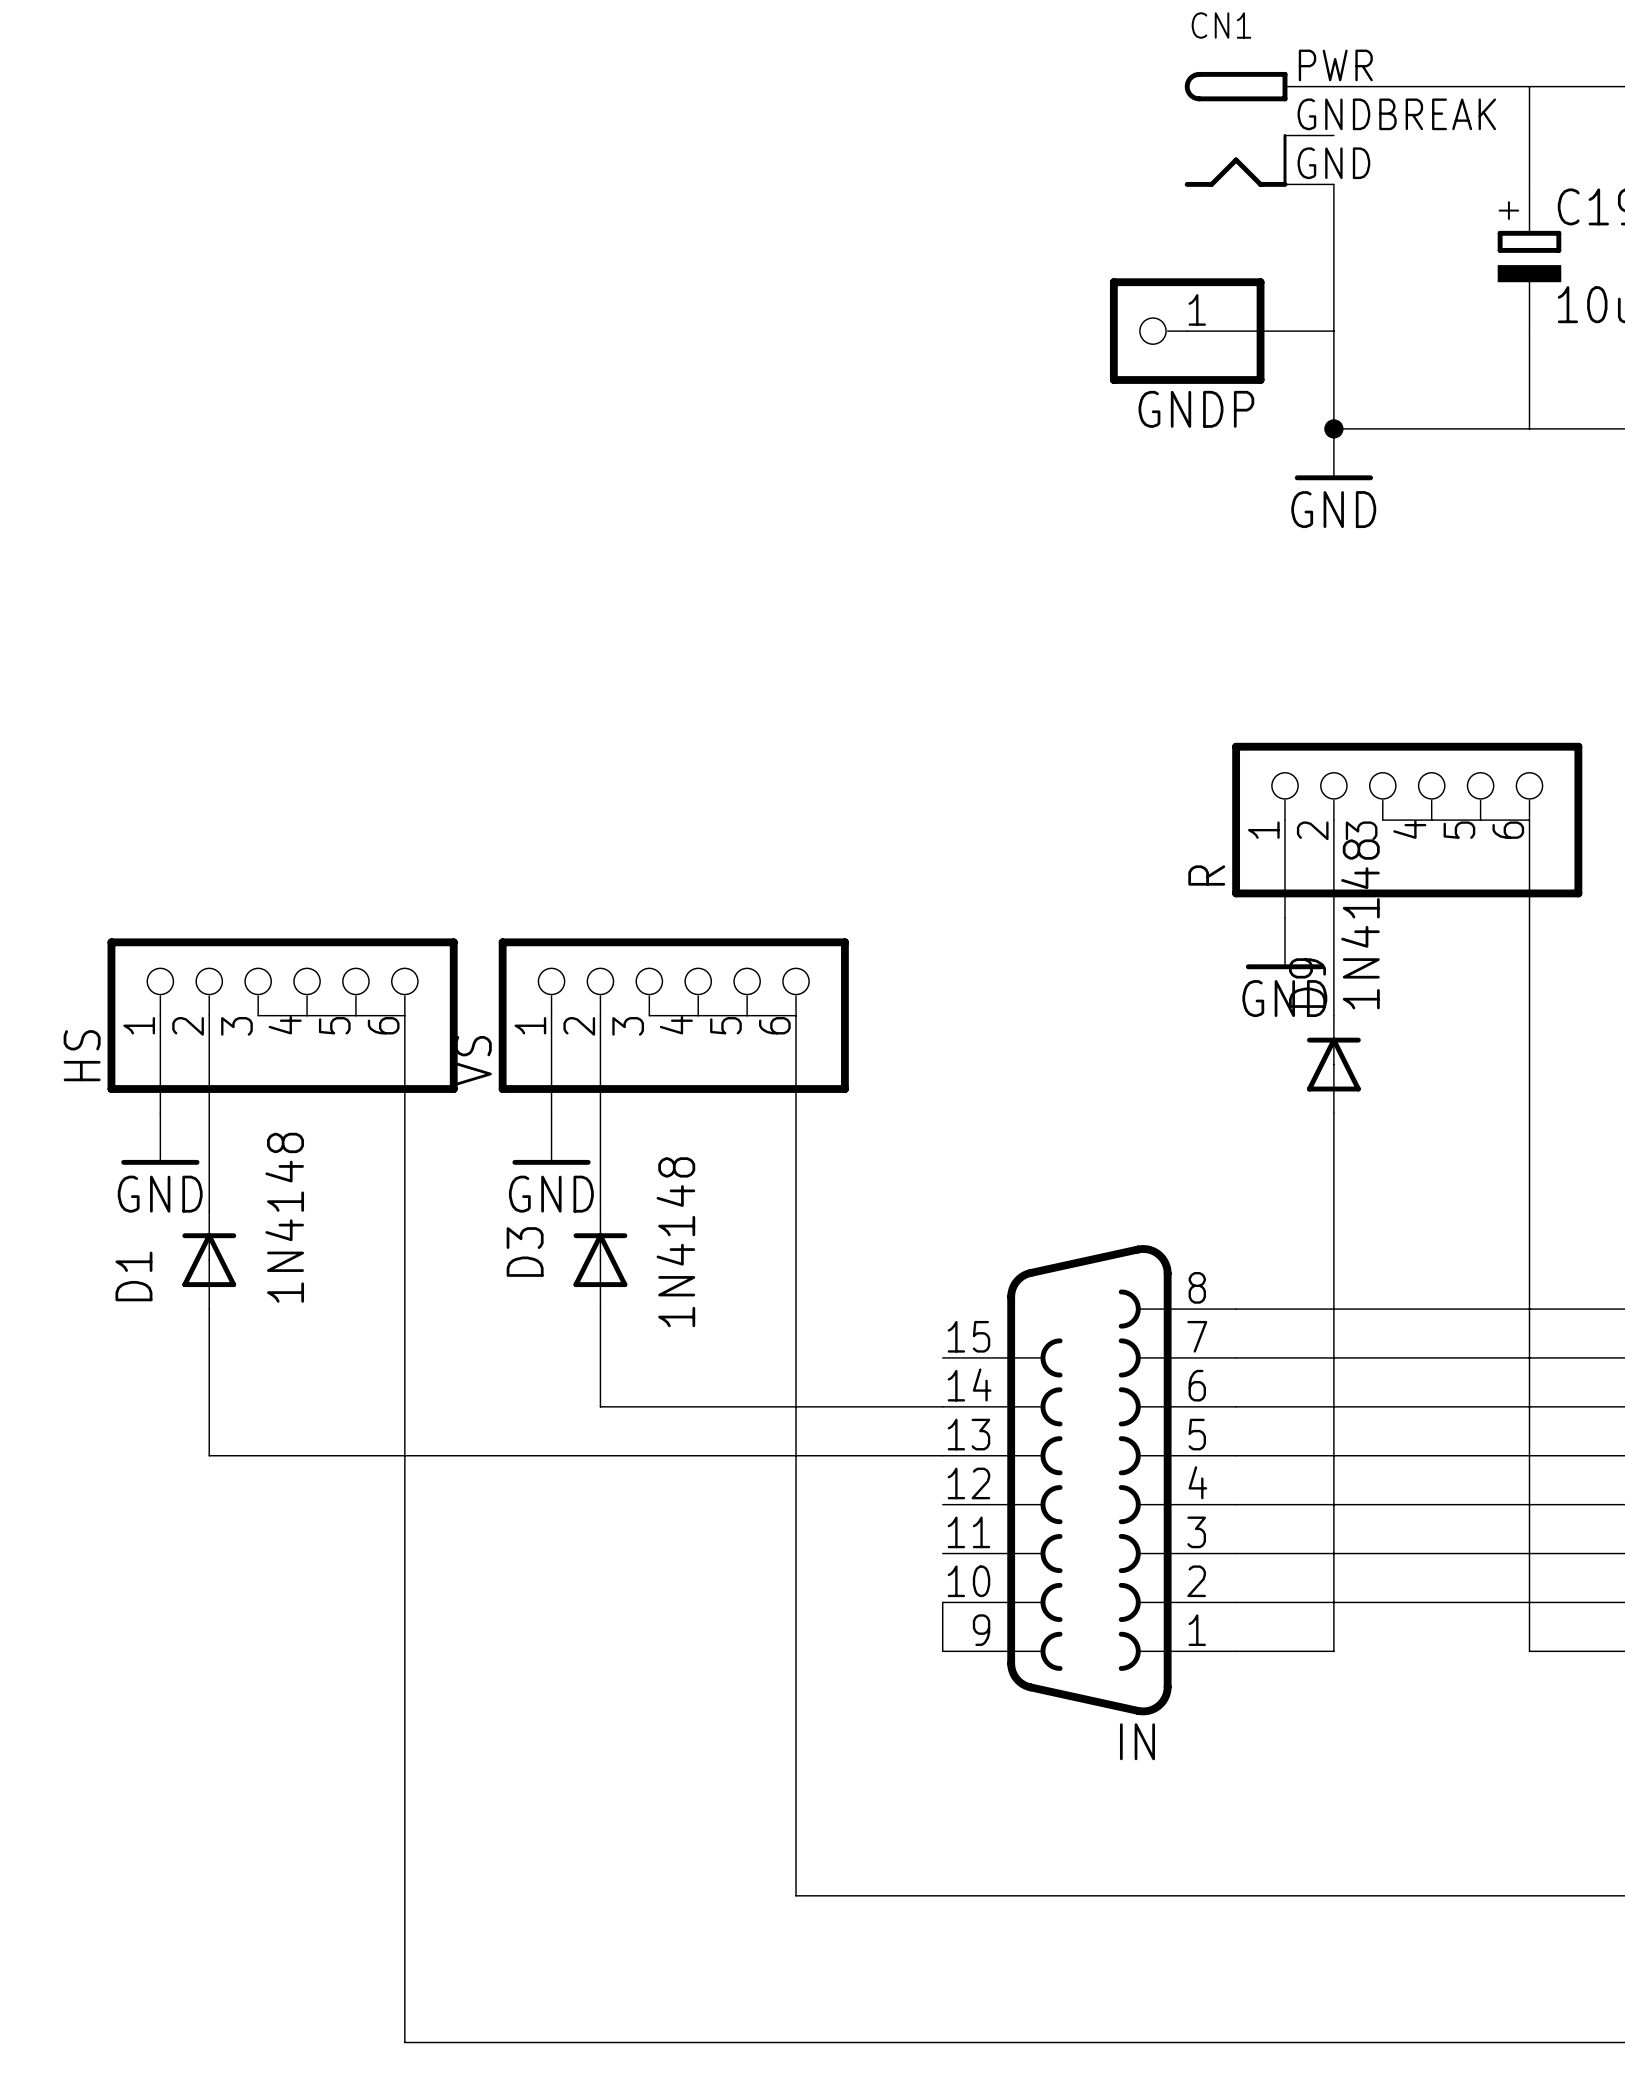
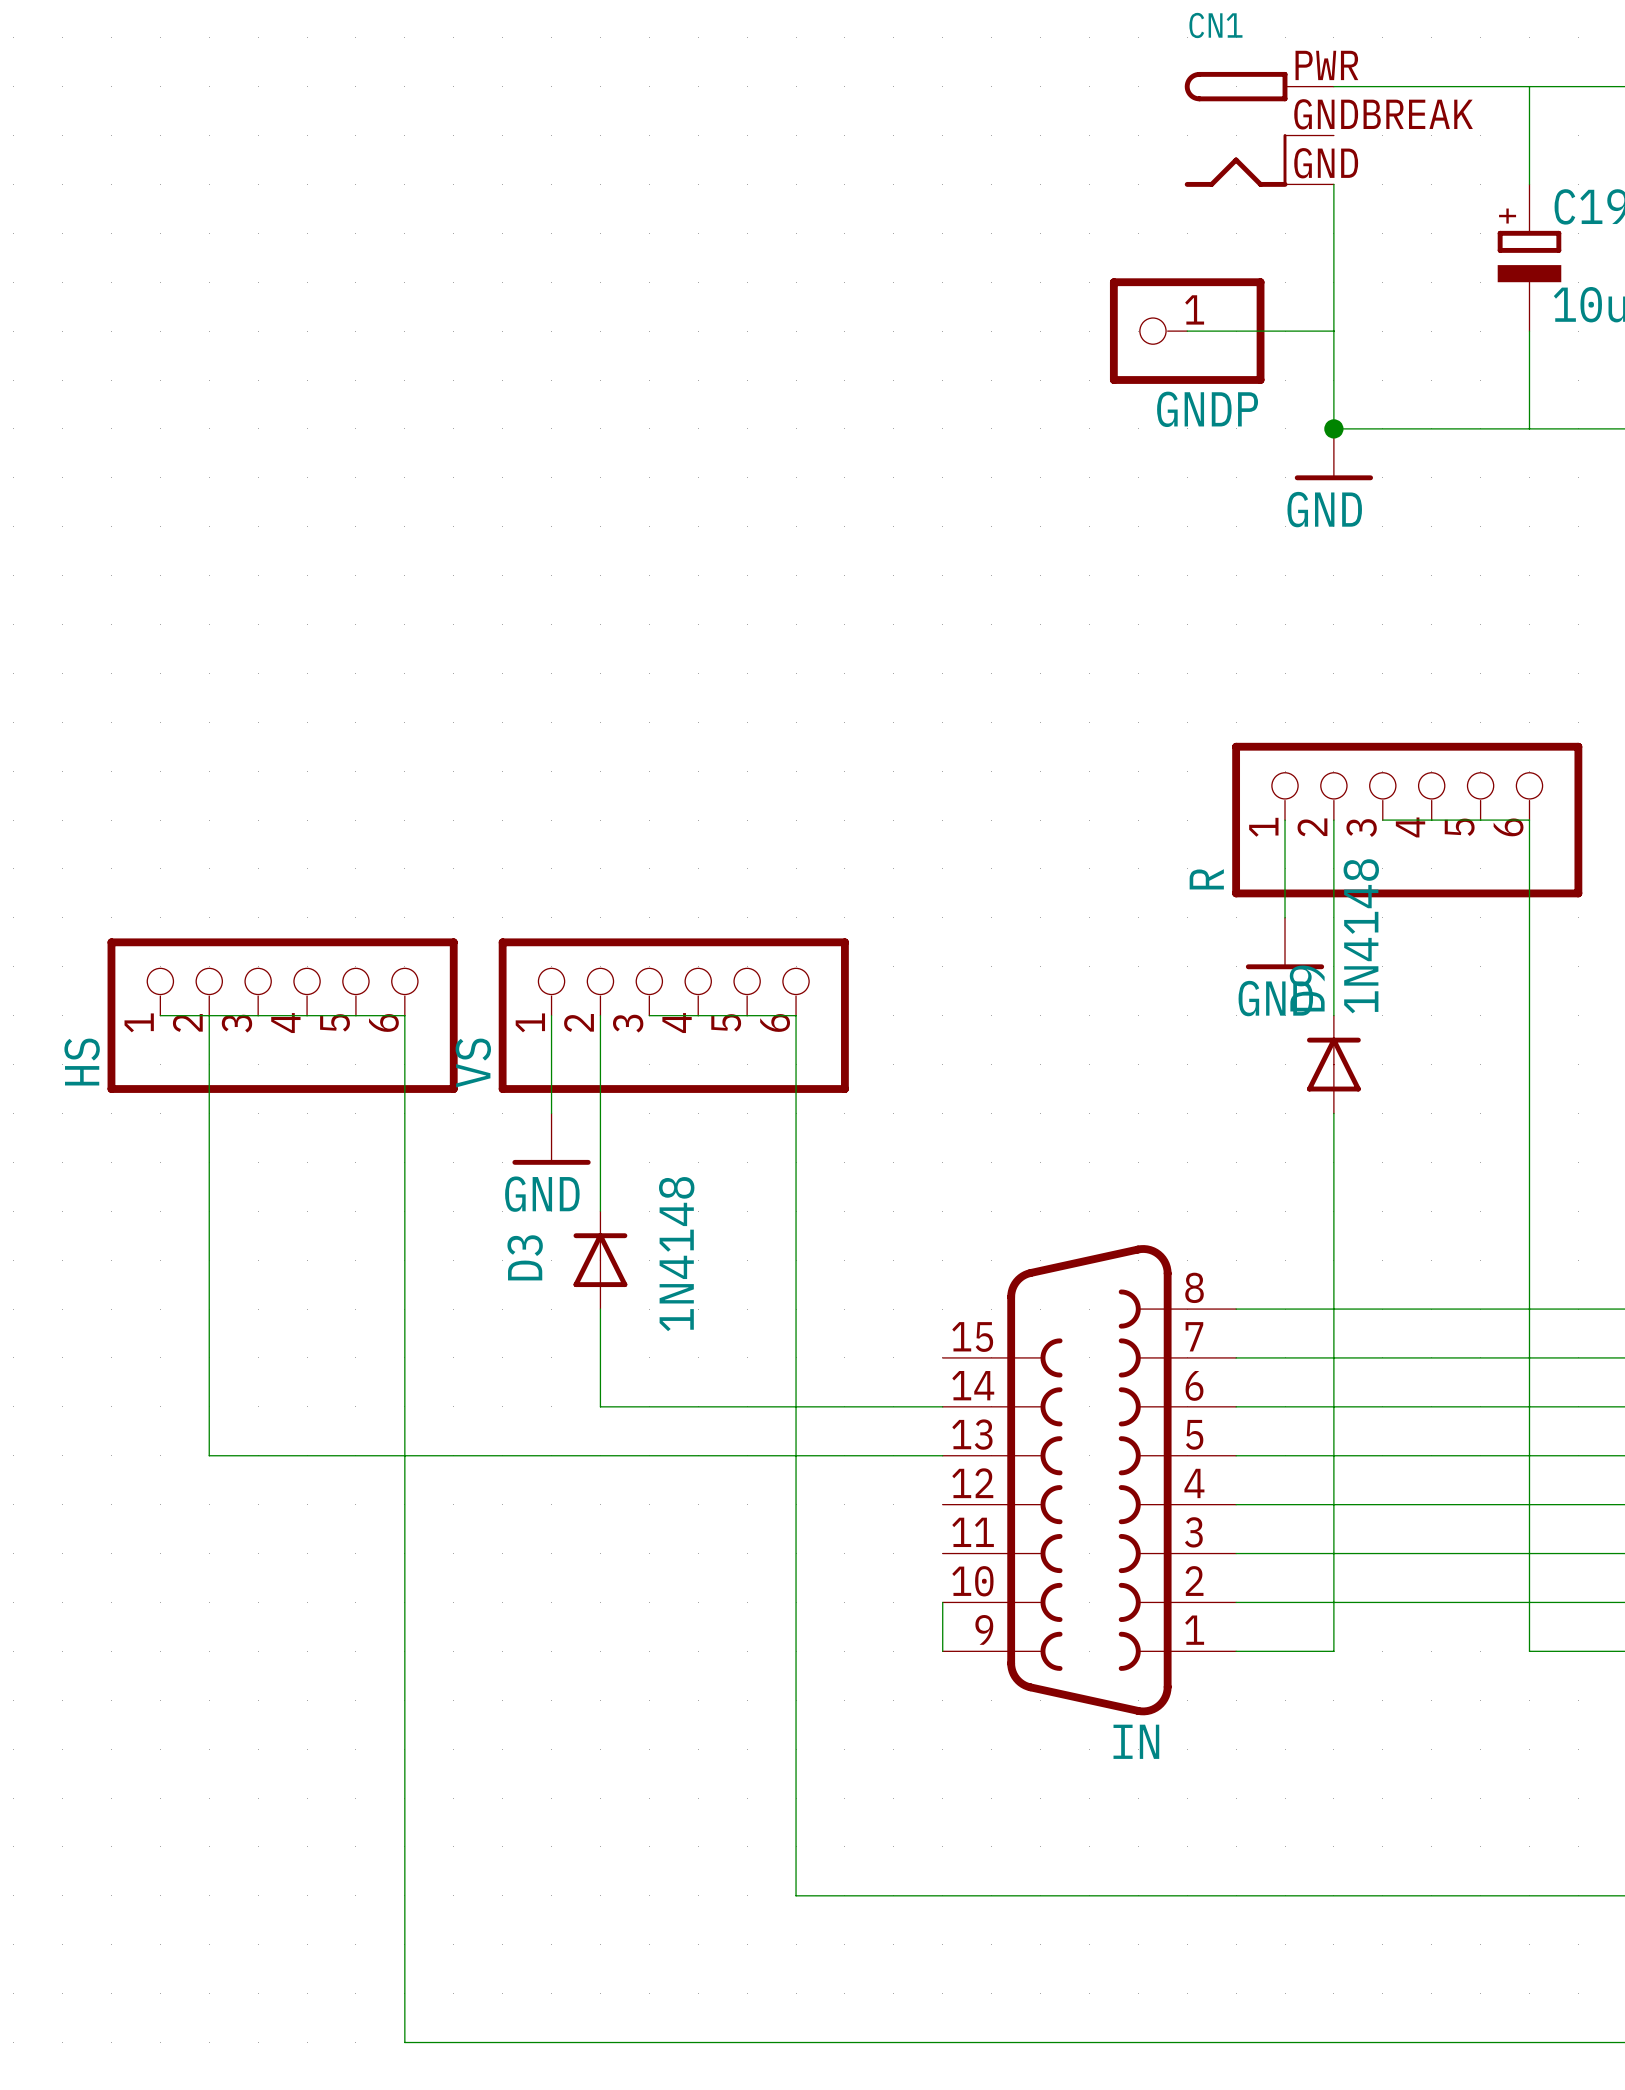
wire: (160, 1015) (160, 1113) -> (160, 1015) (258, 1015)
power symbol: GND (160, 1139) -> none
D1: 1N4148 (209, 1260) -> none

